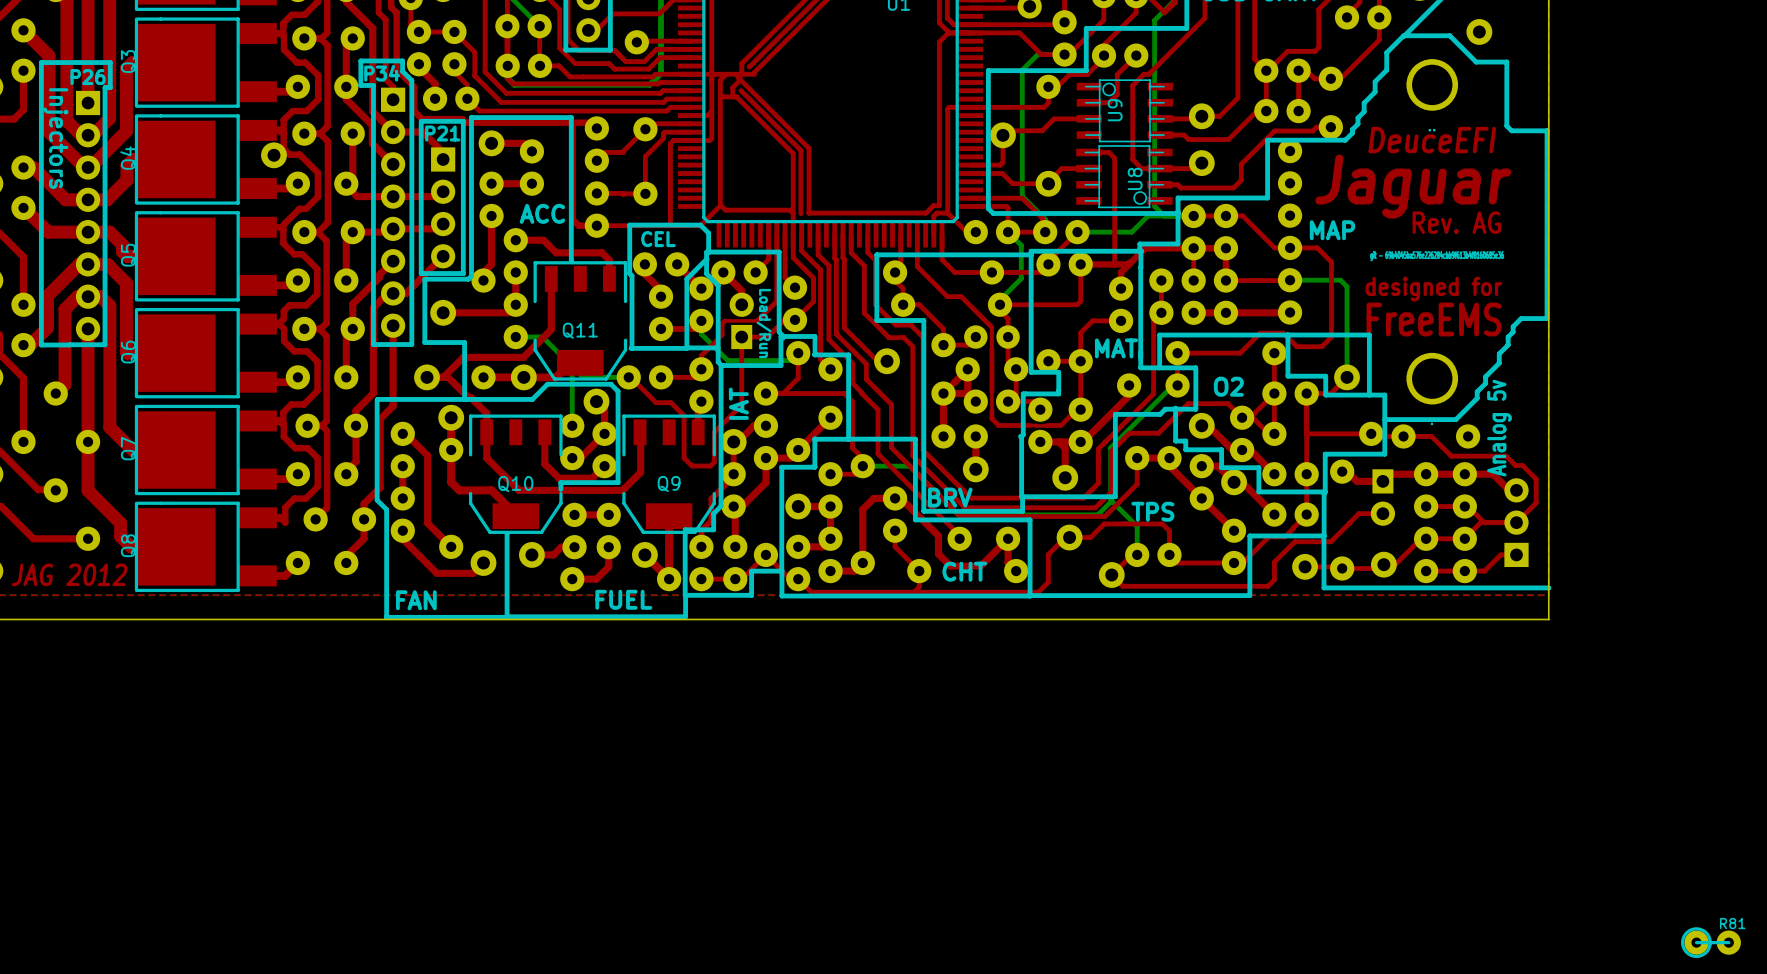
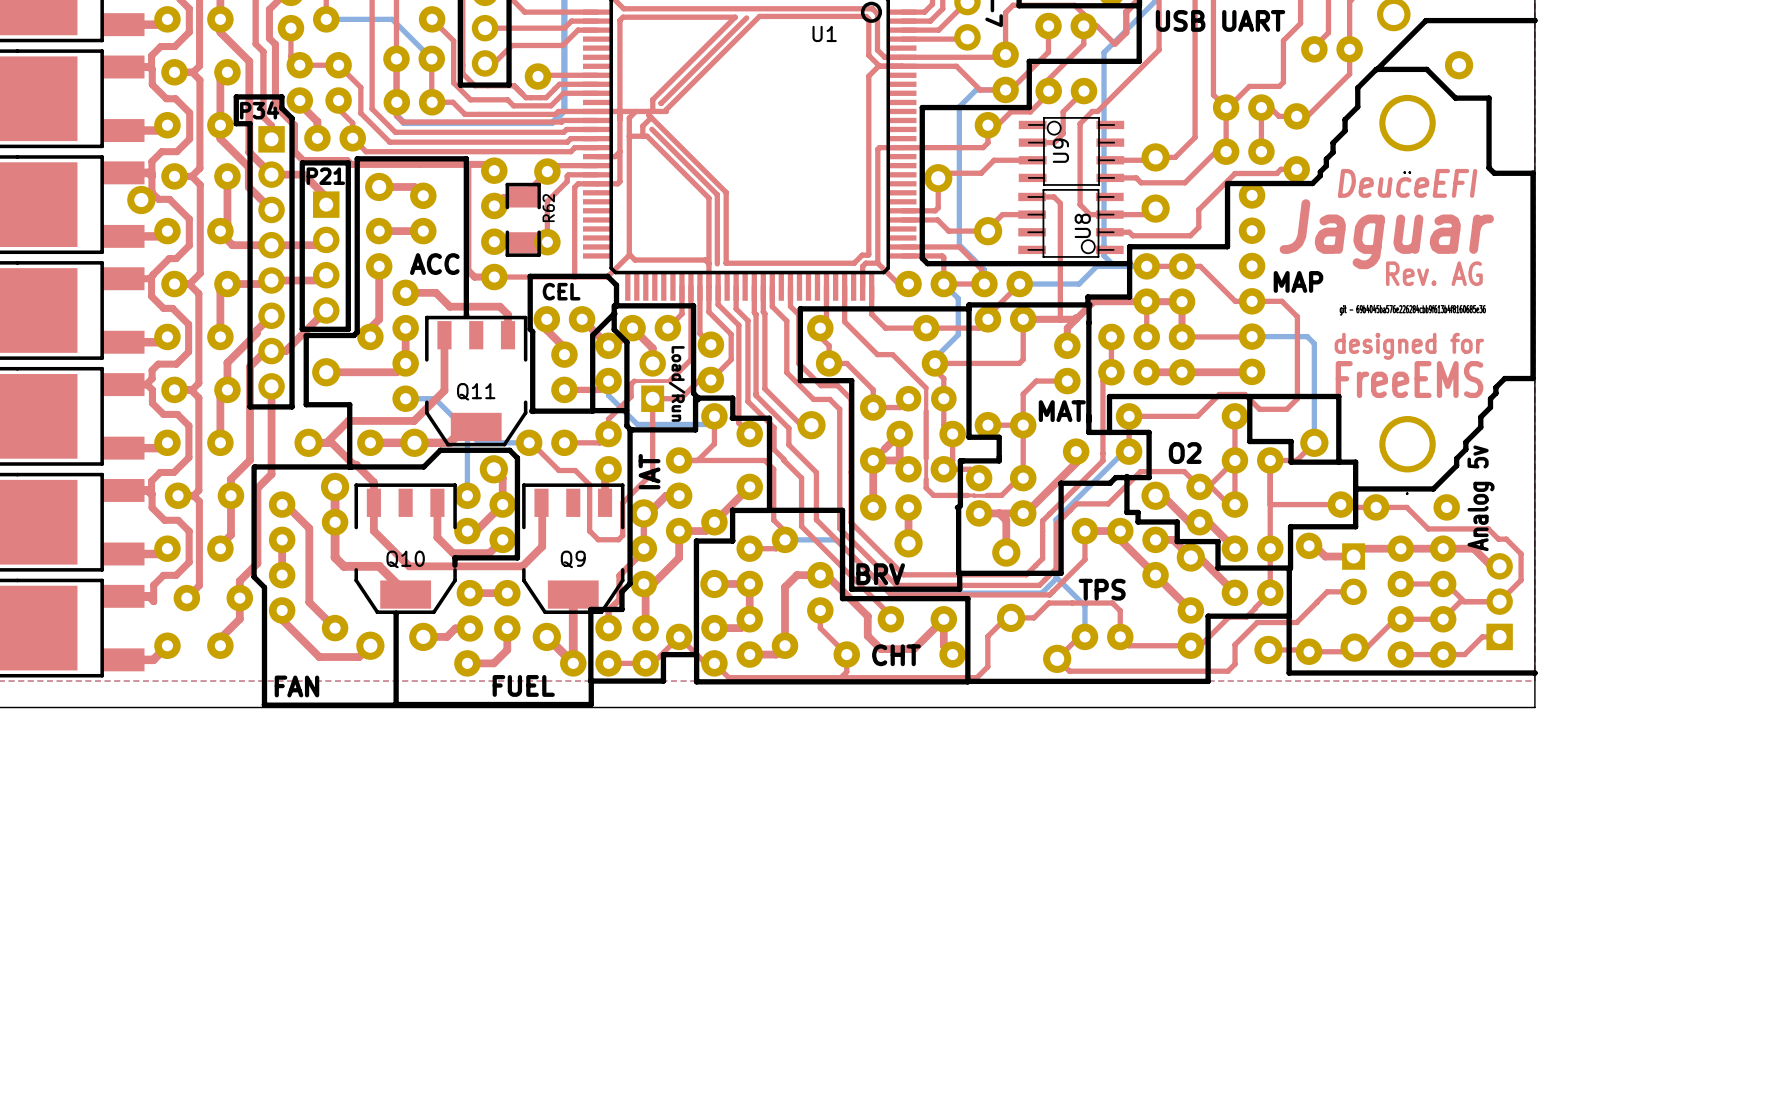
R62: none -> (523, 219)
R81: (1710, 942) -> none

